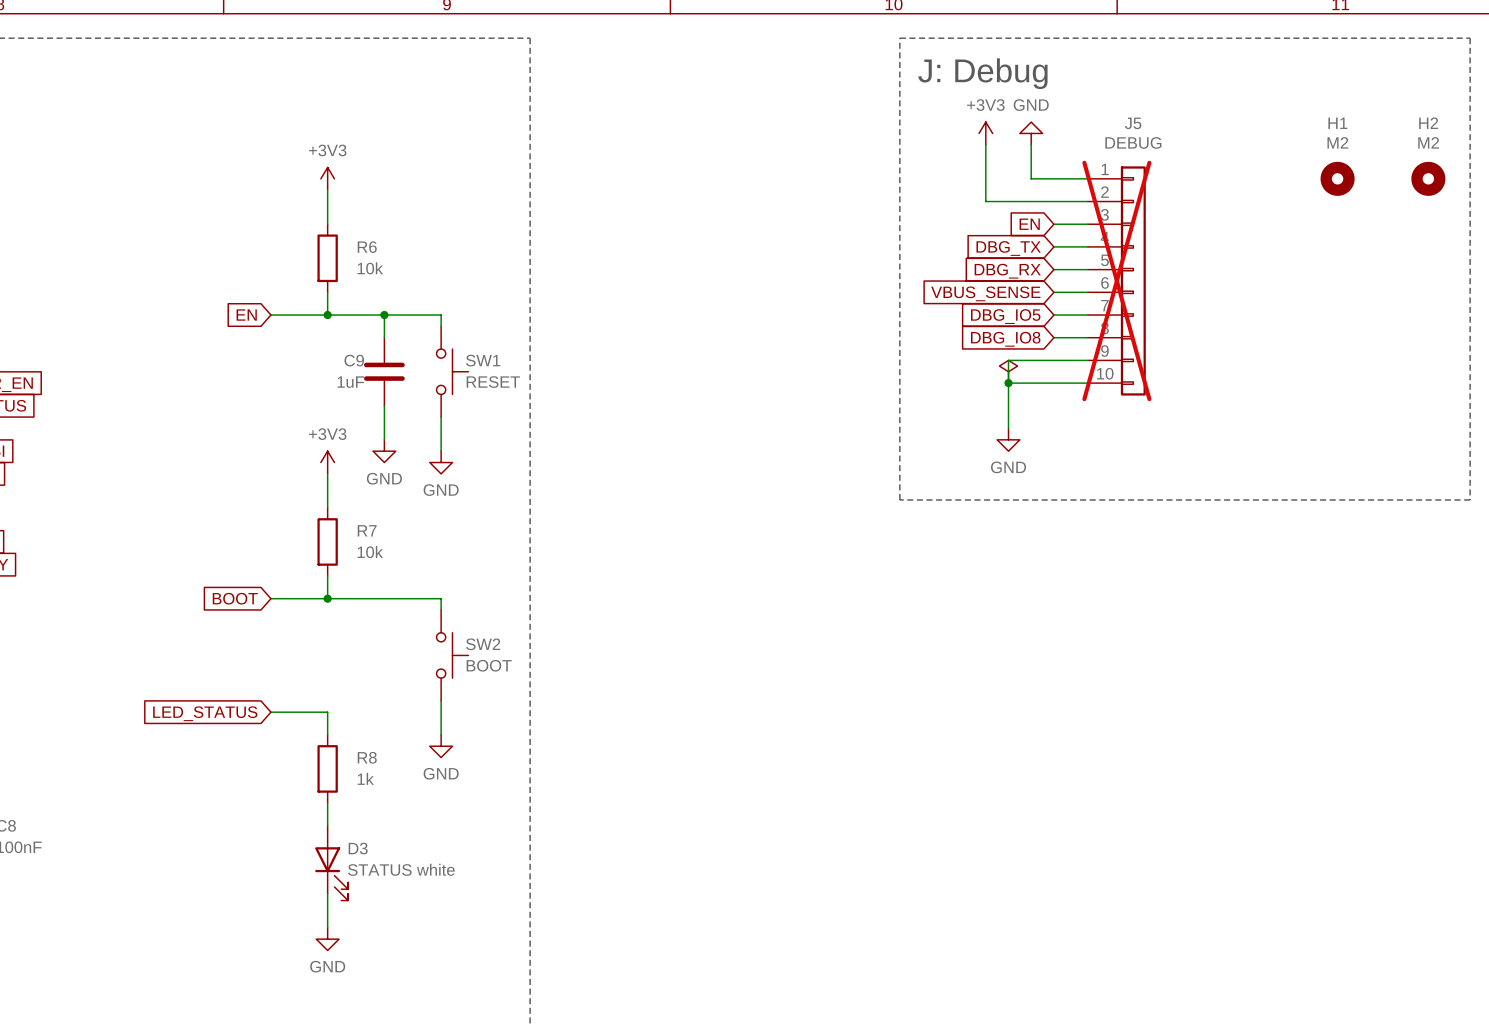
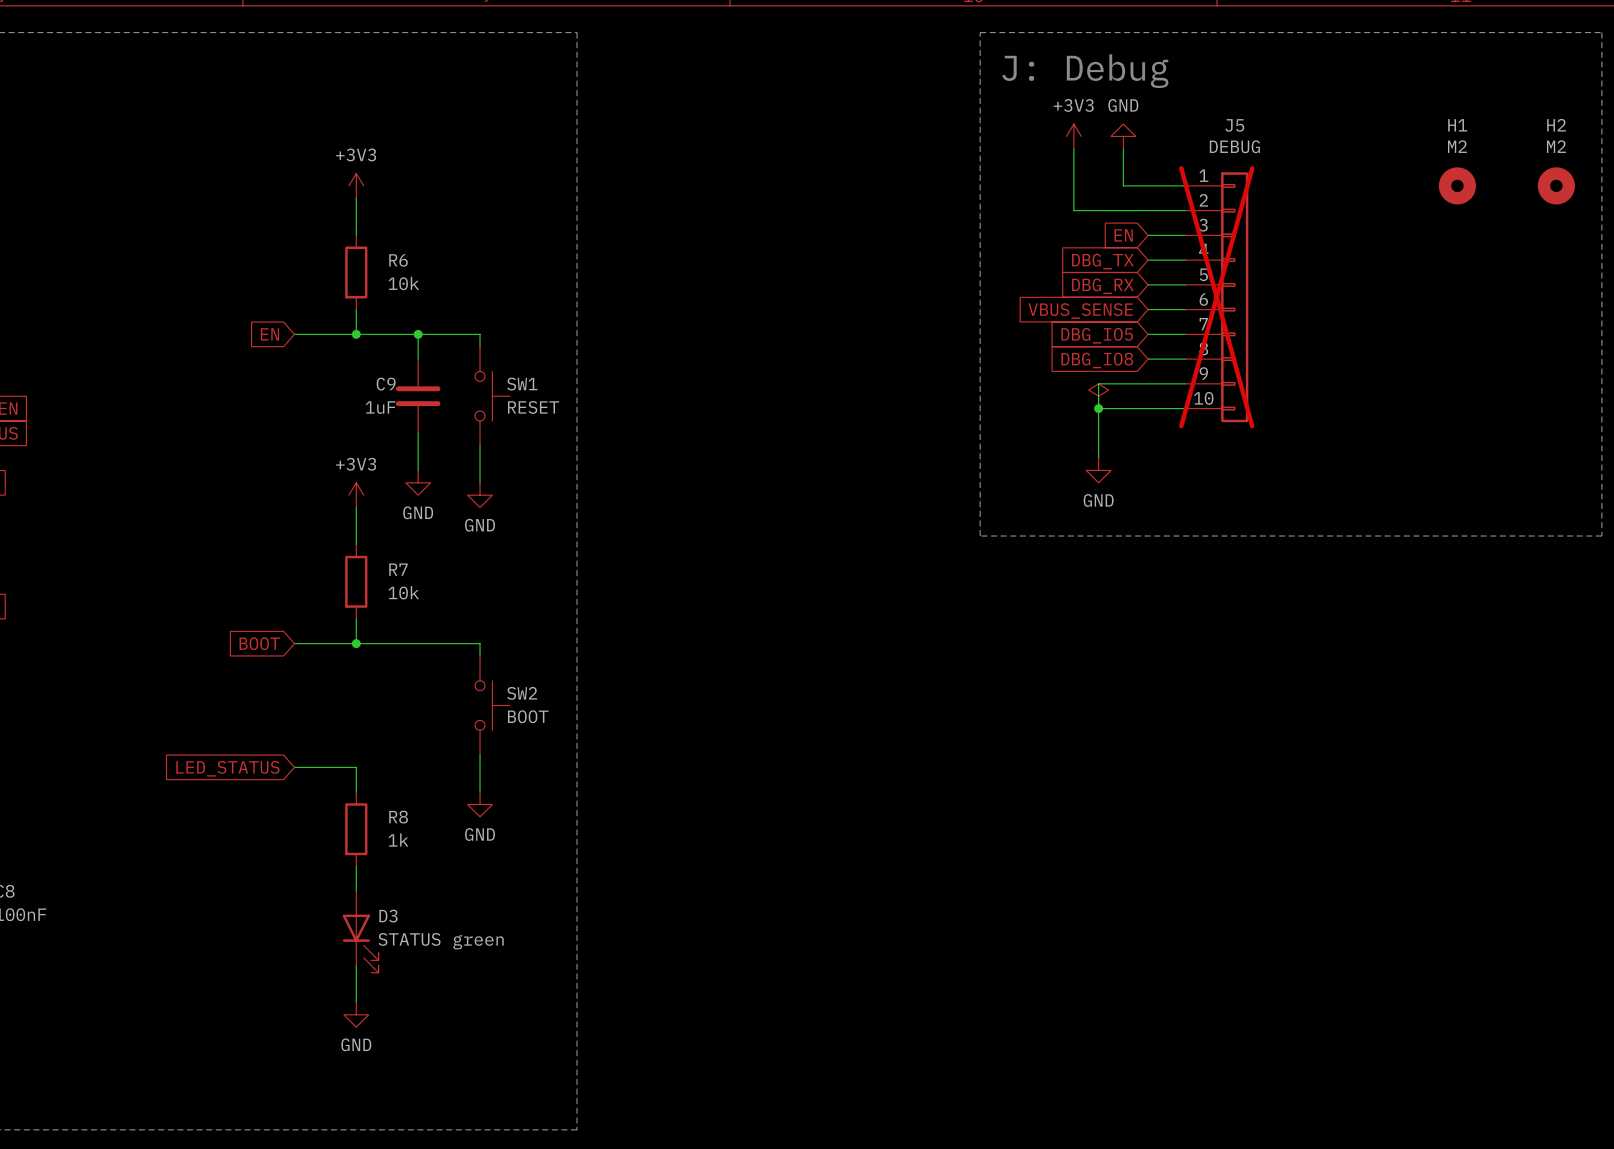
D3 value: STATUS white (401, 869) -> STATUS green (441, 941)

